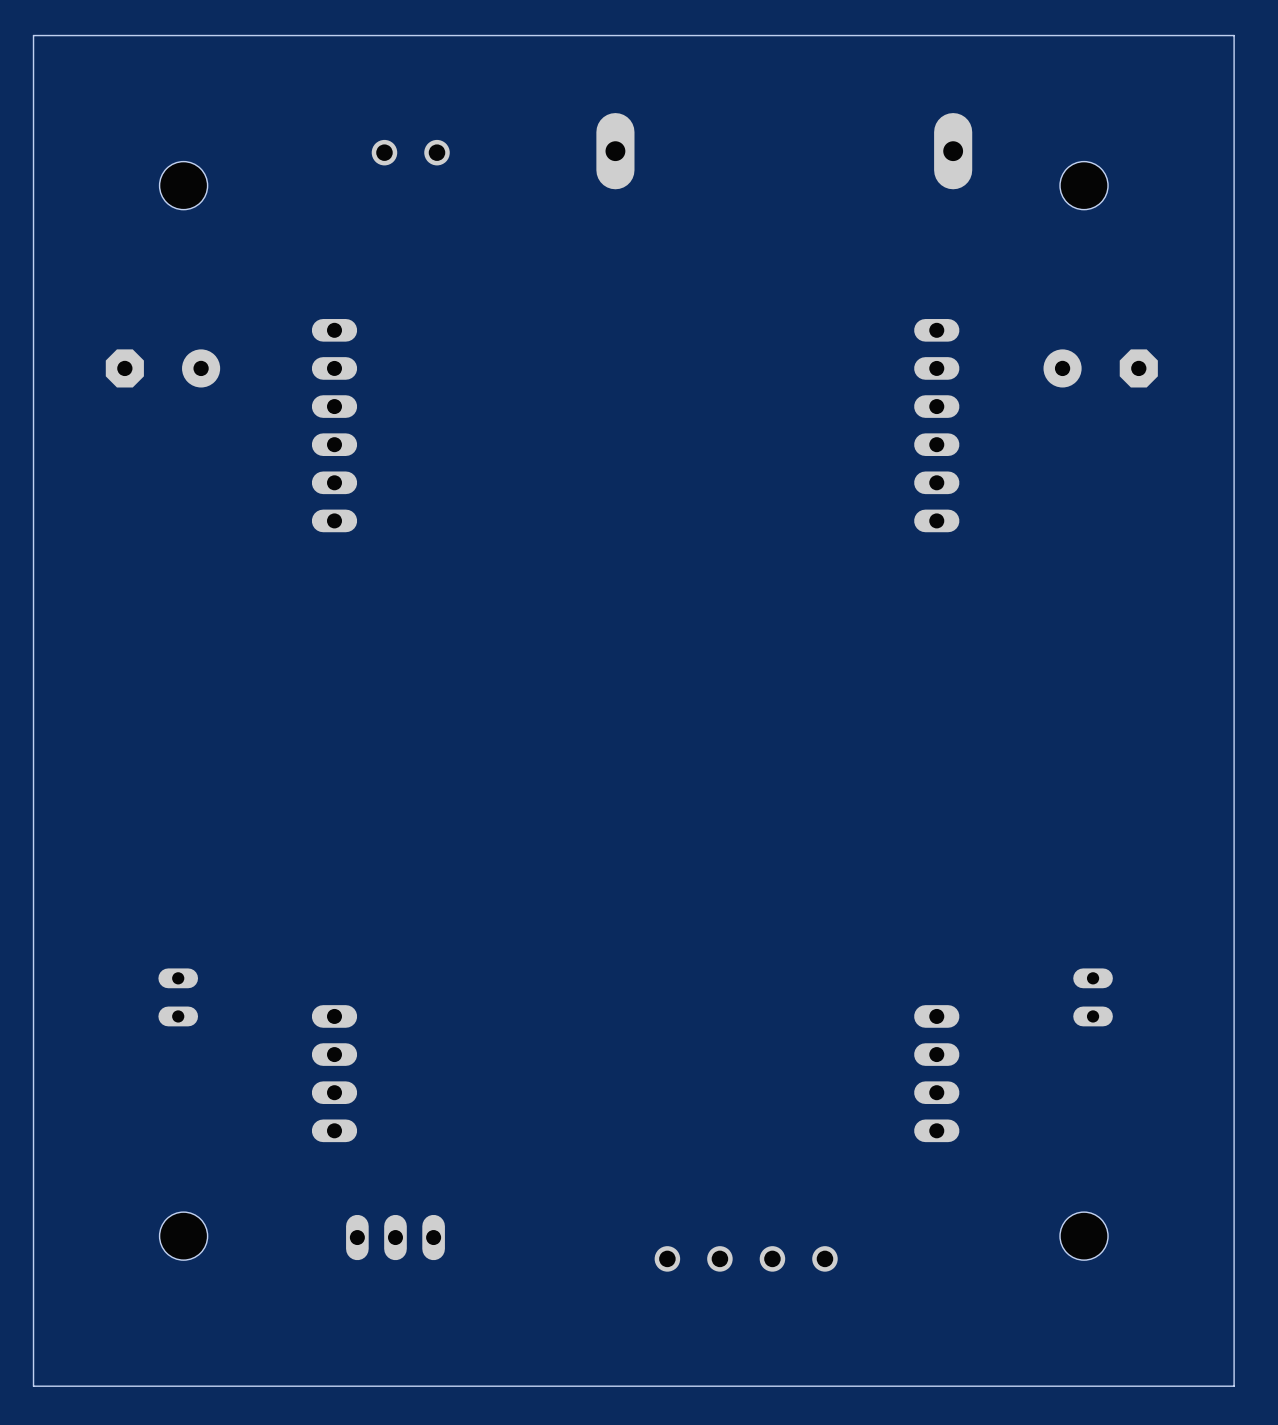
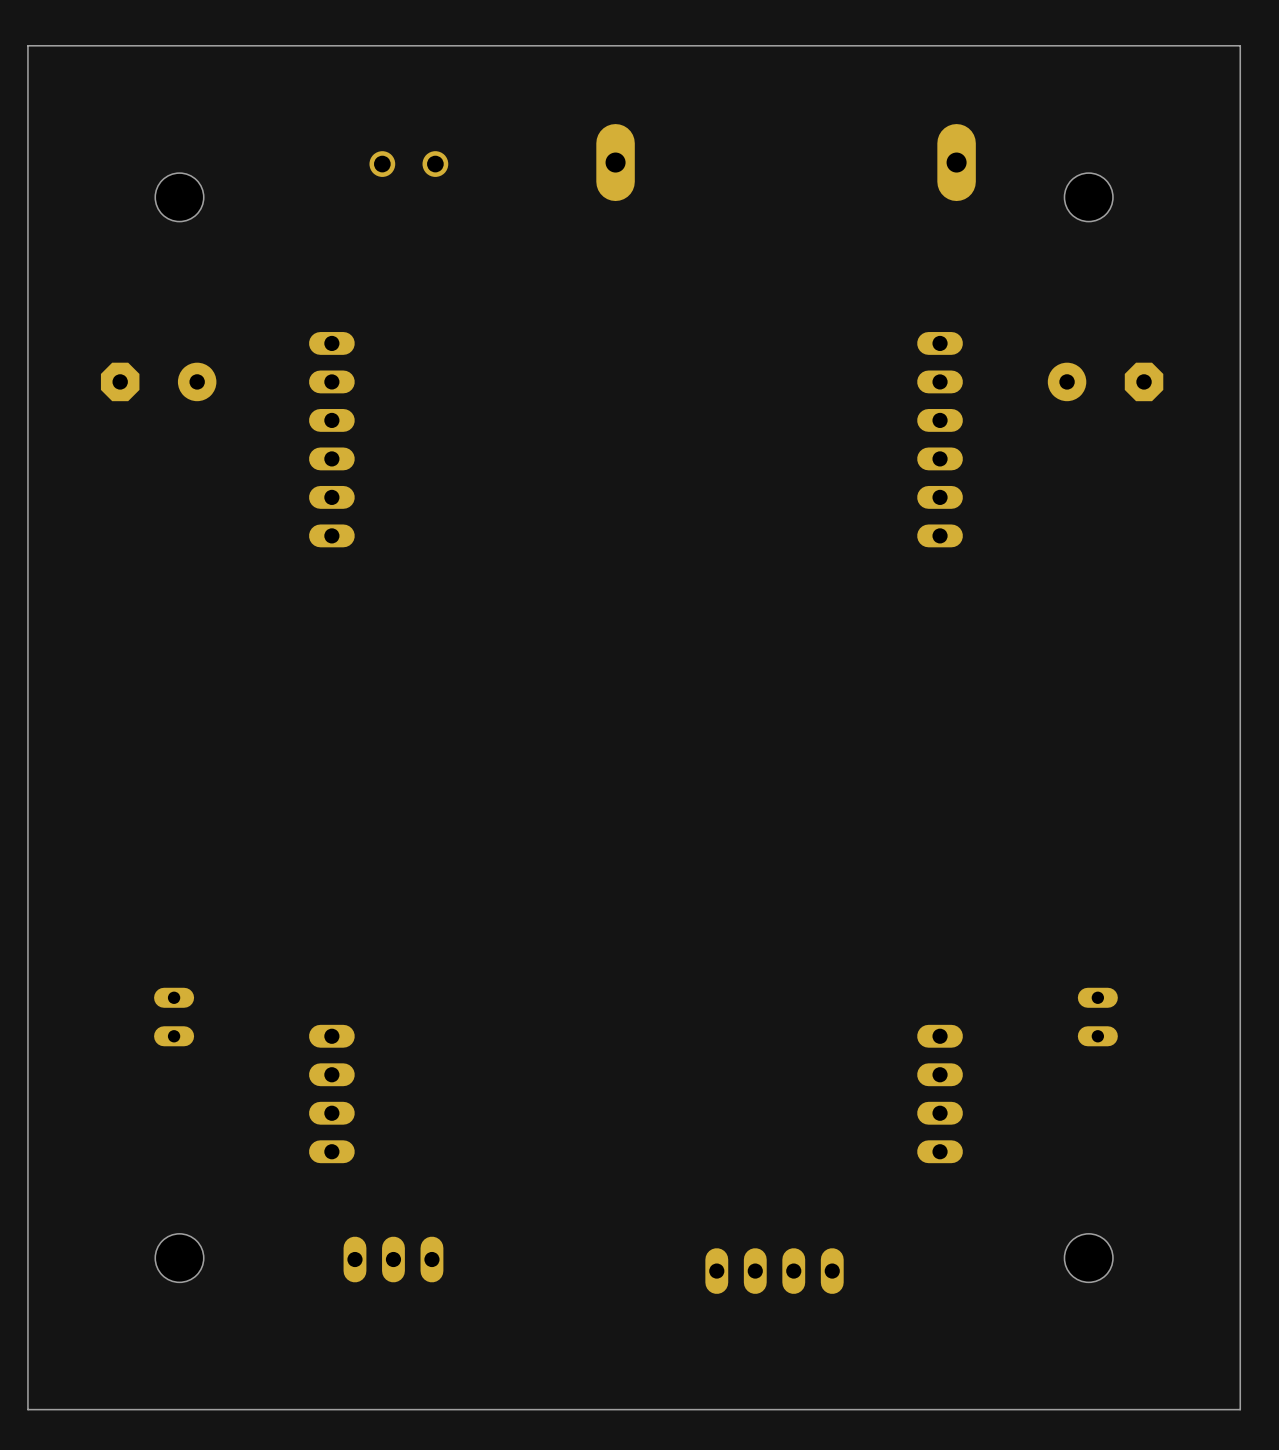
part: none -> (774, 1271)
part: (746, 1258) -> none

